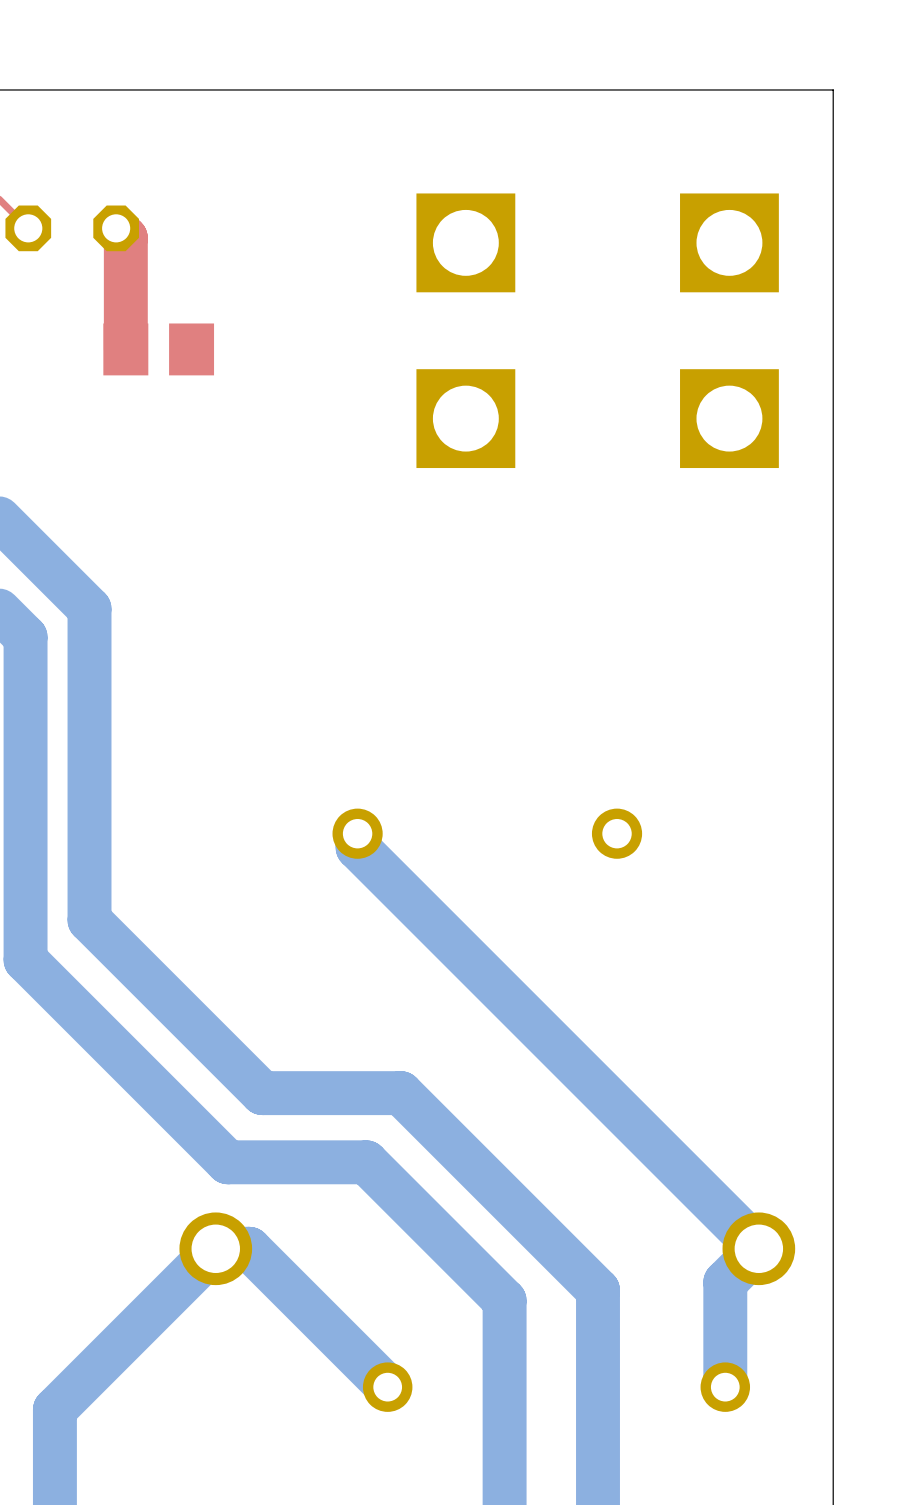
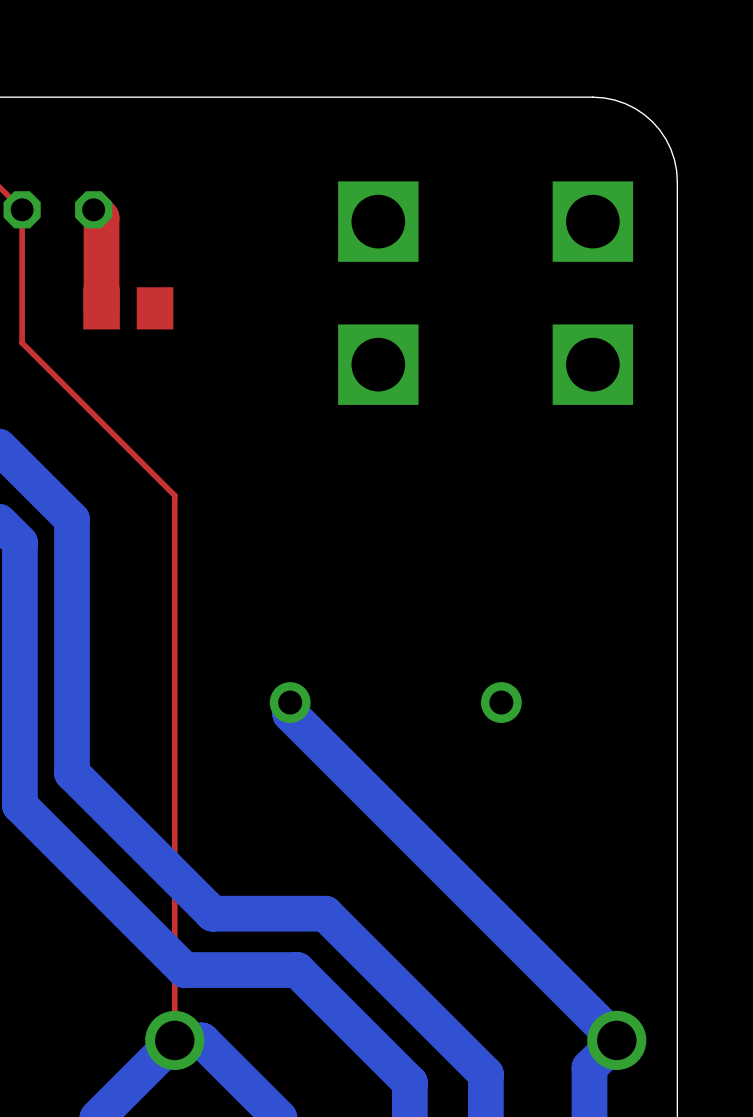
board edge: (729, 89) (833, 89) (833, 193) -> (592, 97) (625, 103) (652, 121) (670, 149) (677, 181)
top track: none -> (22, 209) (22, 342) (174, 495) (174, 1040)

